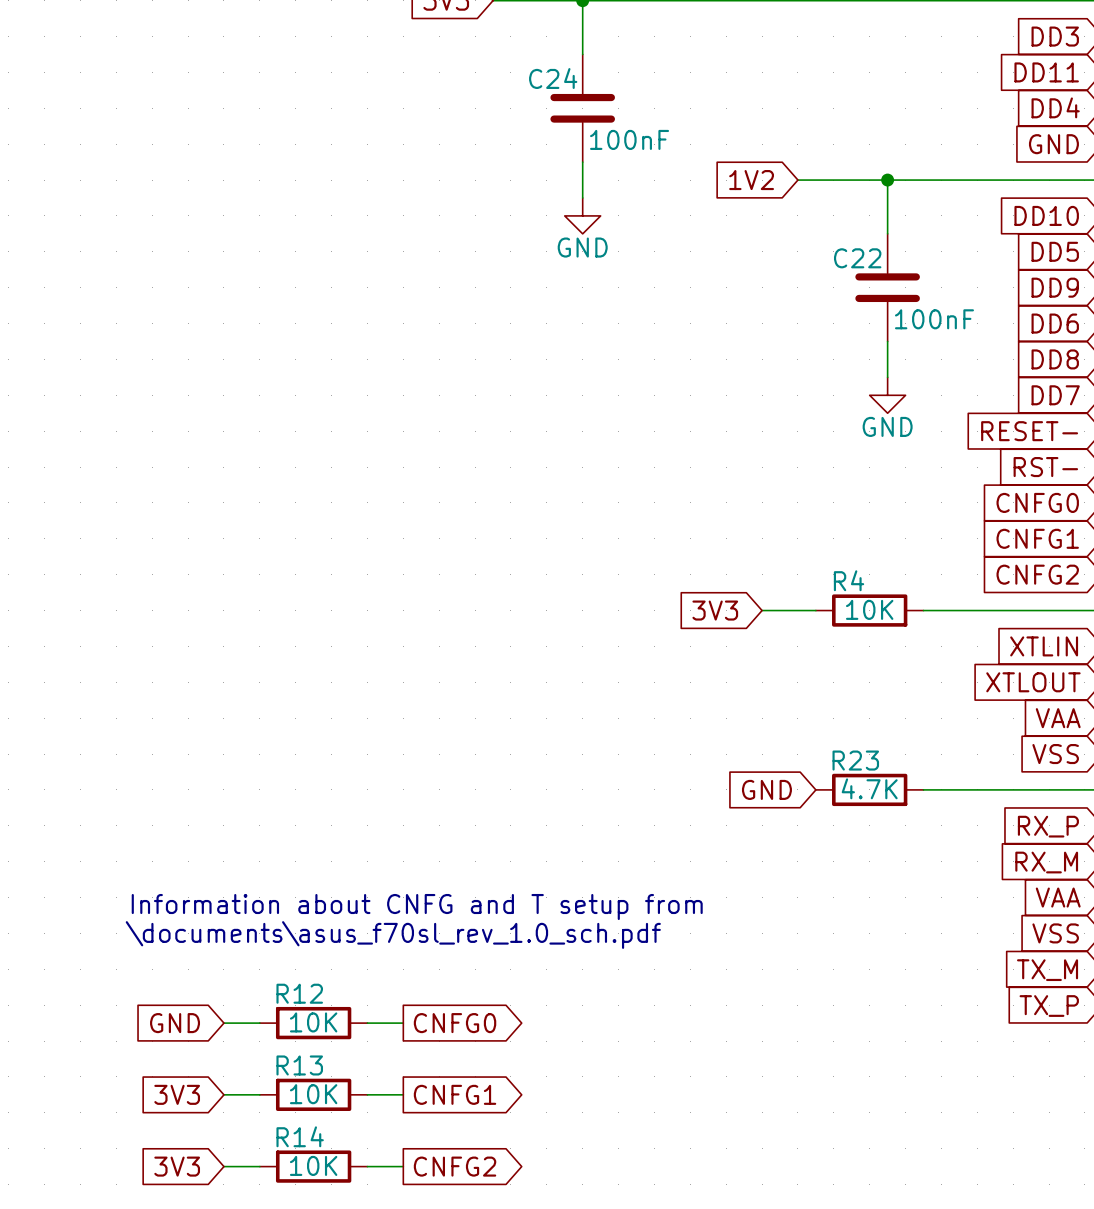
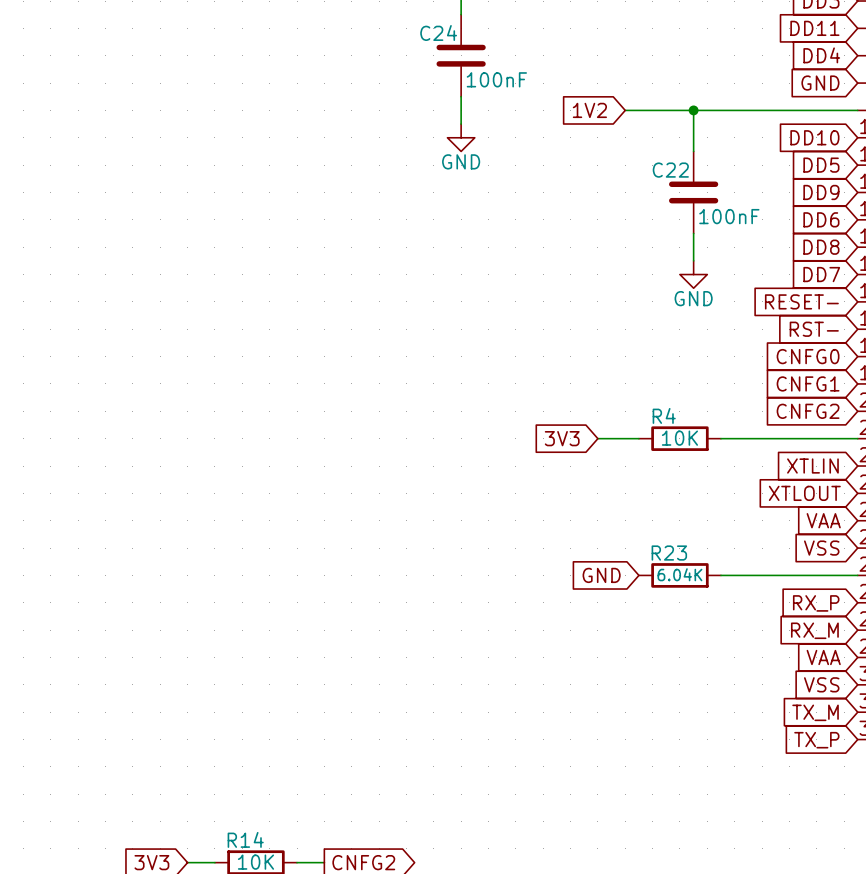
R23 value: 4.7K (869, 788) -> 6.04K (679, 574)
text: Information about CNFG and T setup from (417, 907) -> none
text: \documents\asus_f70sl_rev_1.0_sch.pdf (393, 935) -> none
global label: GND (175, 1023) -> none
wire: (223, 1023) (259, 1023) -> none
R12: 10K (313, 1023) -> none
wire: (367, 1023) (403, 1023) -> none
global label: CNFG0 (455, 1023) -> none
global label: 3V3 (177, 1094) -> none
wire: (223, 1094) (259, 1094) -> none
R13: 10K (313, 1094) -> none
wire: (367, 1094) (403, 1094) -> none
global label: CNFG1 (455, 1094) -> none

